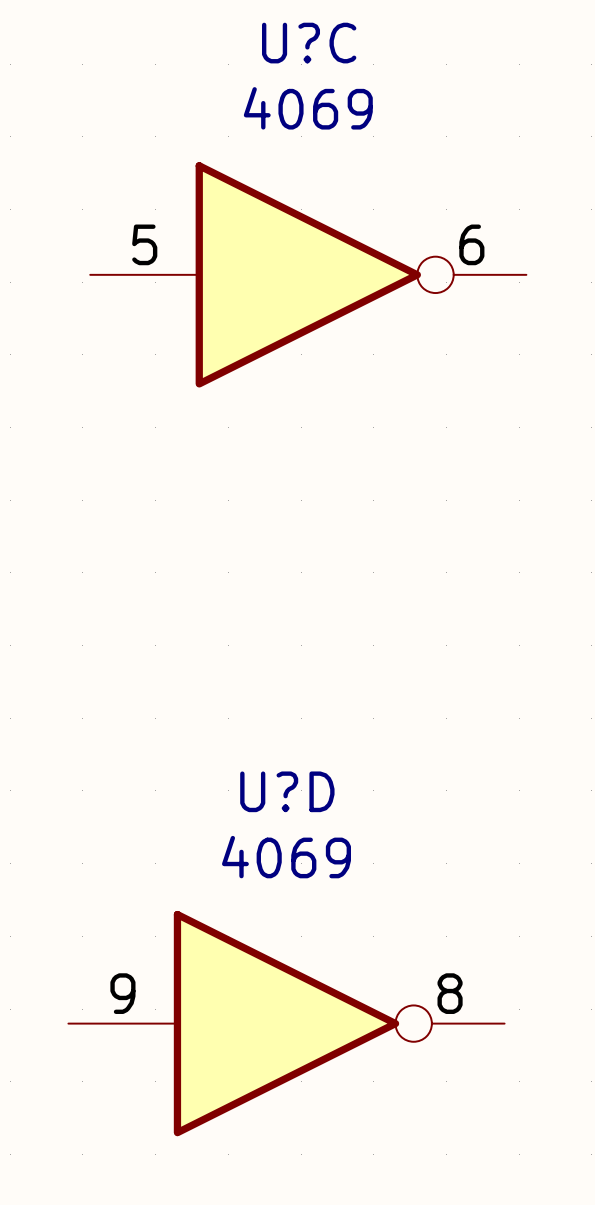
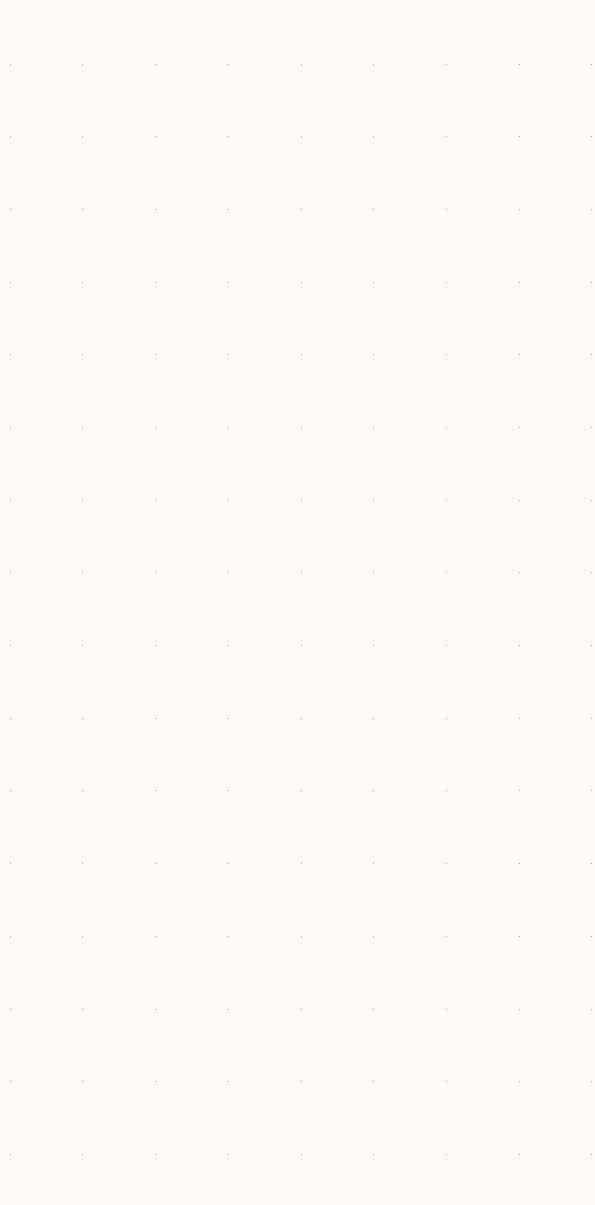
U?C: 4069 (308, 274) -> none
U?D: 4069 (286, 1023) -> none

